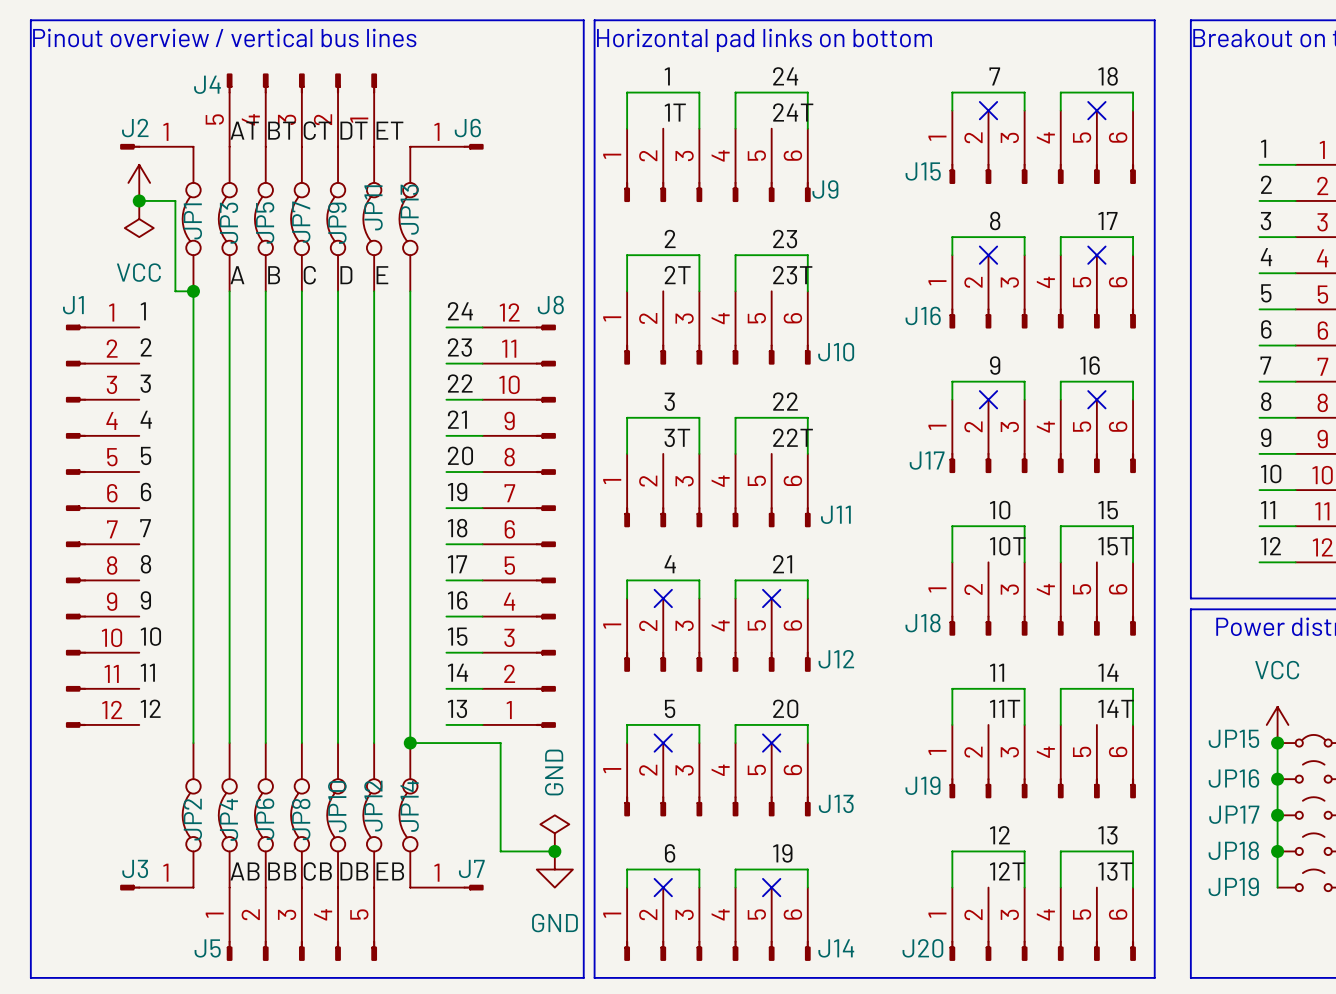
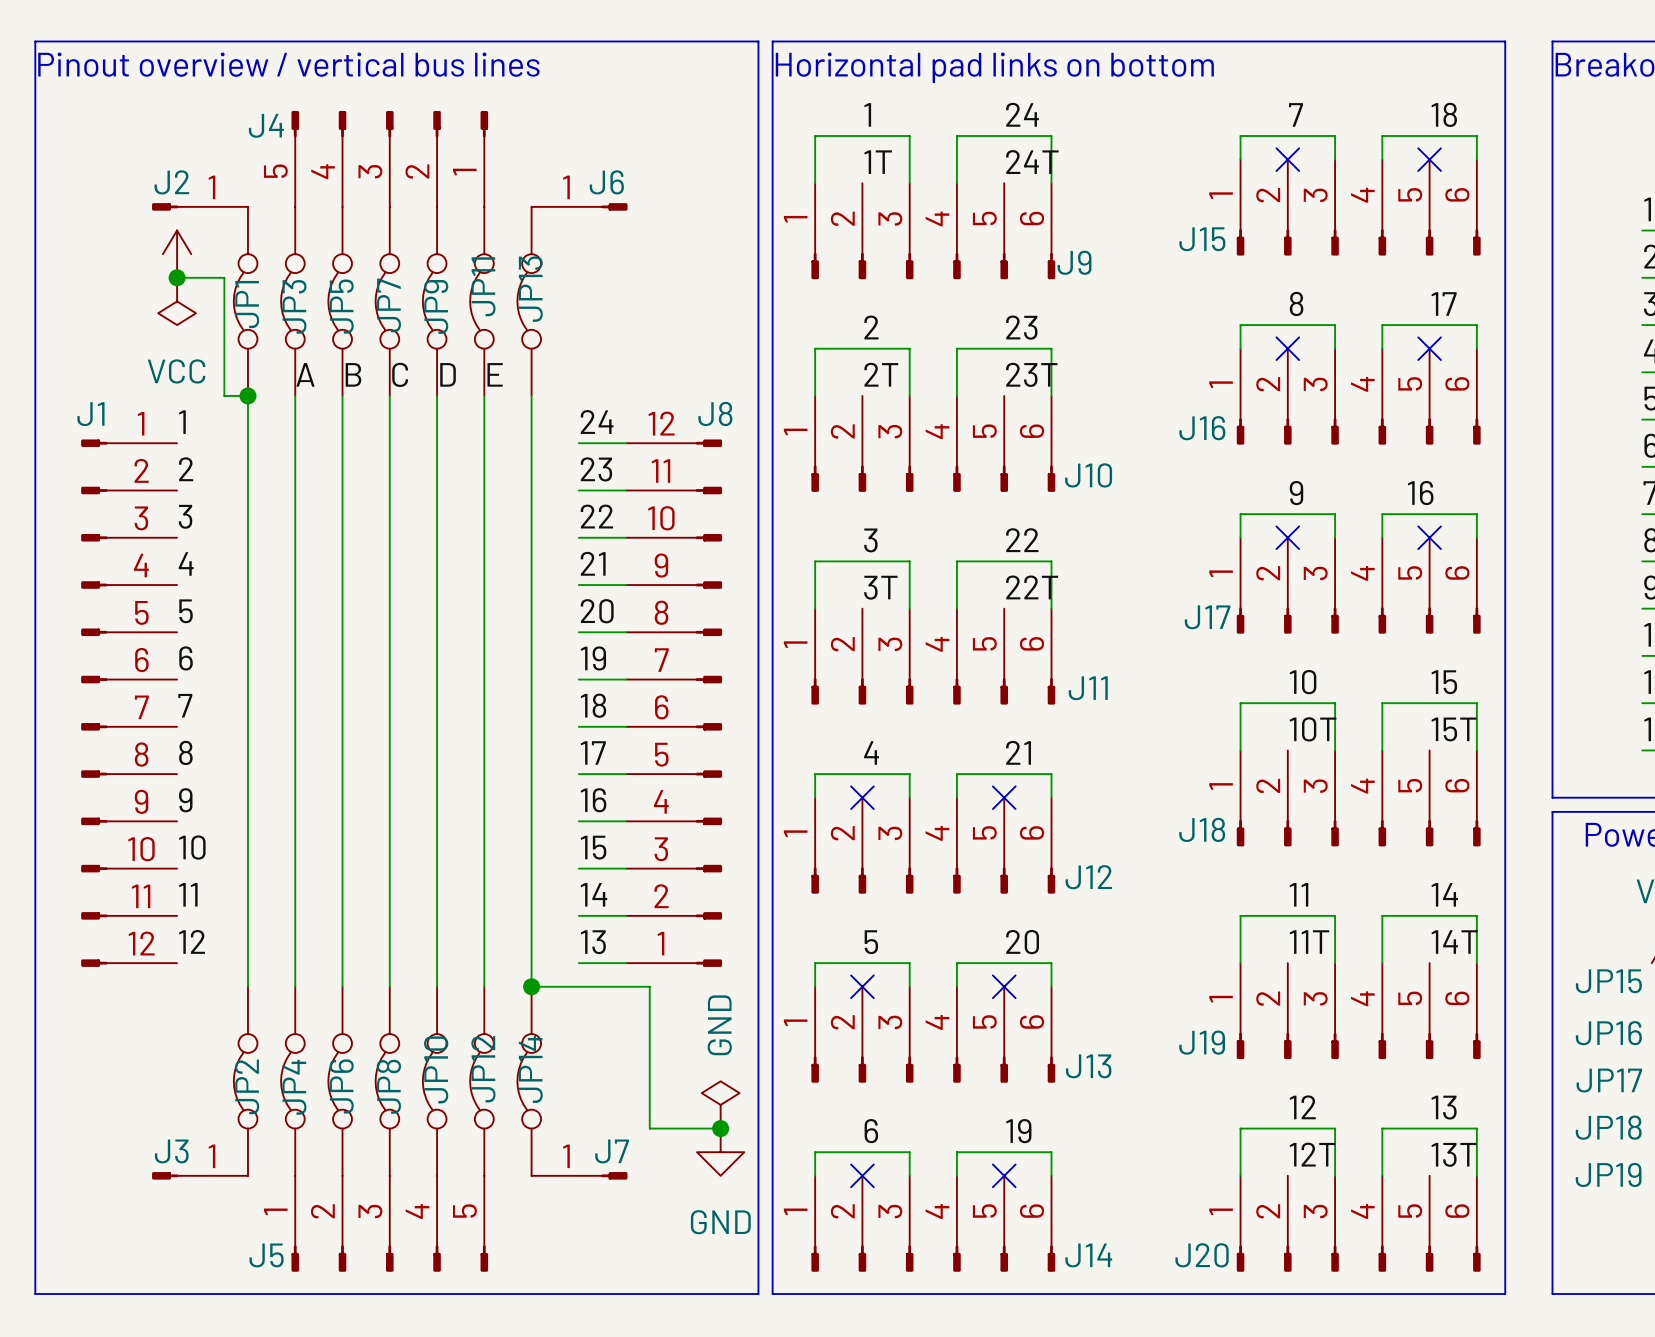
label: AT (244, 130) -> none
label: BT (281, 130) -> none
label: CT (317, 130) -> none
label: DT (353, 130) -> none
label: ET (389, 130) -> none
label: AB (245, 871) -> none
label: BB (282, 871) -> none
label: CB (317, 871) -> none
label: DB (354, 871) -> none
label: EB (390, 871) -> none

